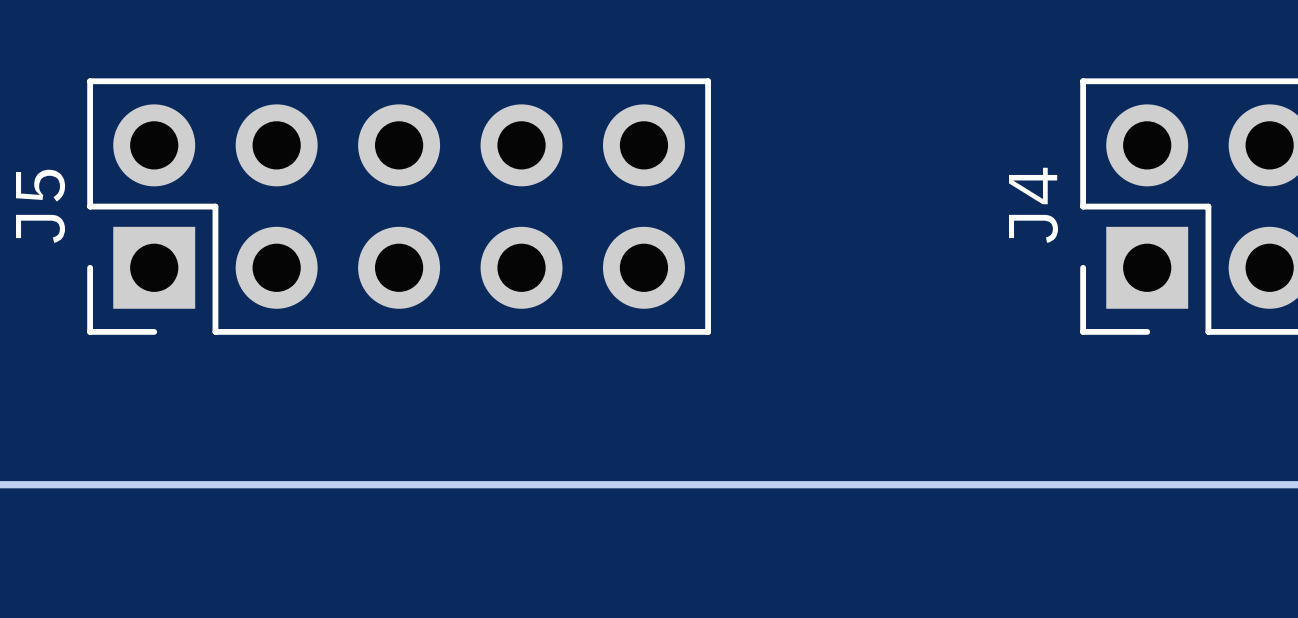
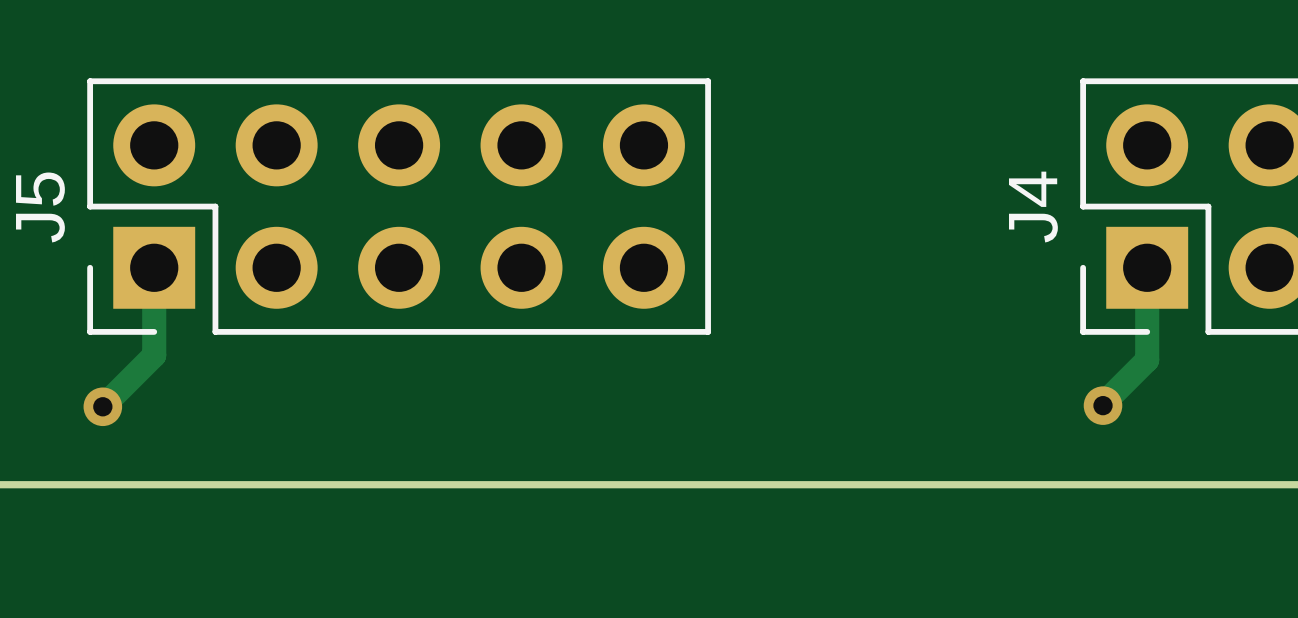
track: none -> (154, 267) (154, 355) (102, 406)
track: none -> (1147, 267) (1147, 360) (1103, 405)
via: none -> (1103, 405)
via: none -> (102, 406)

